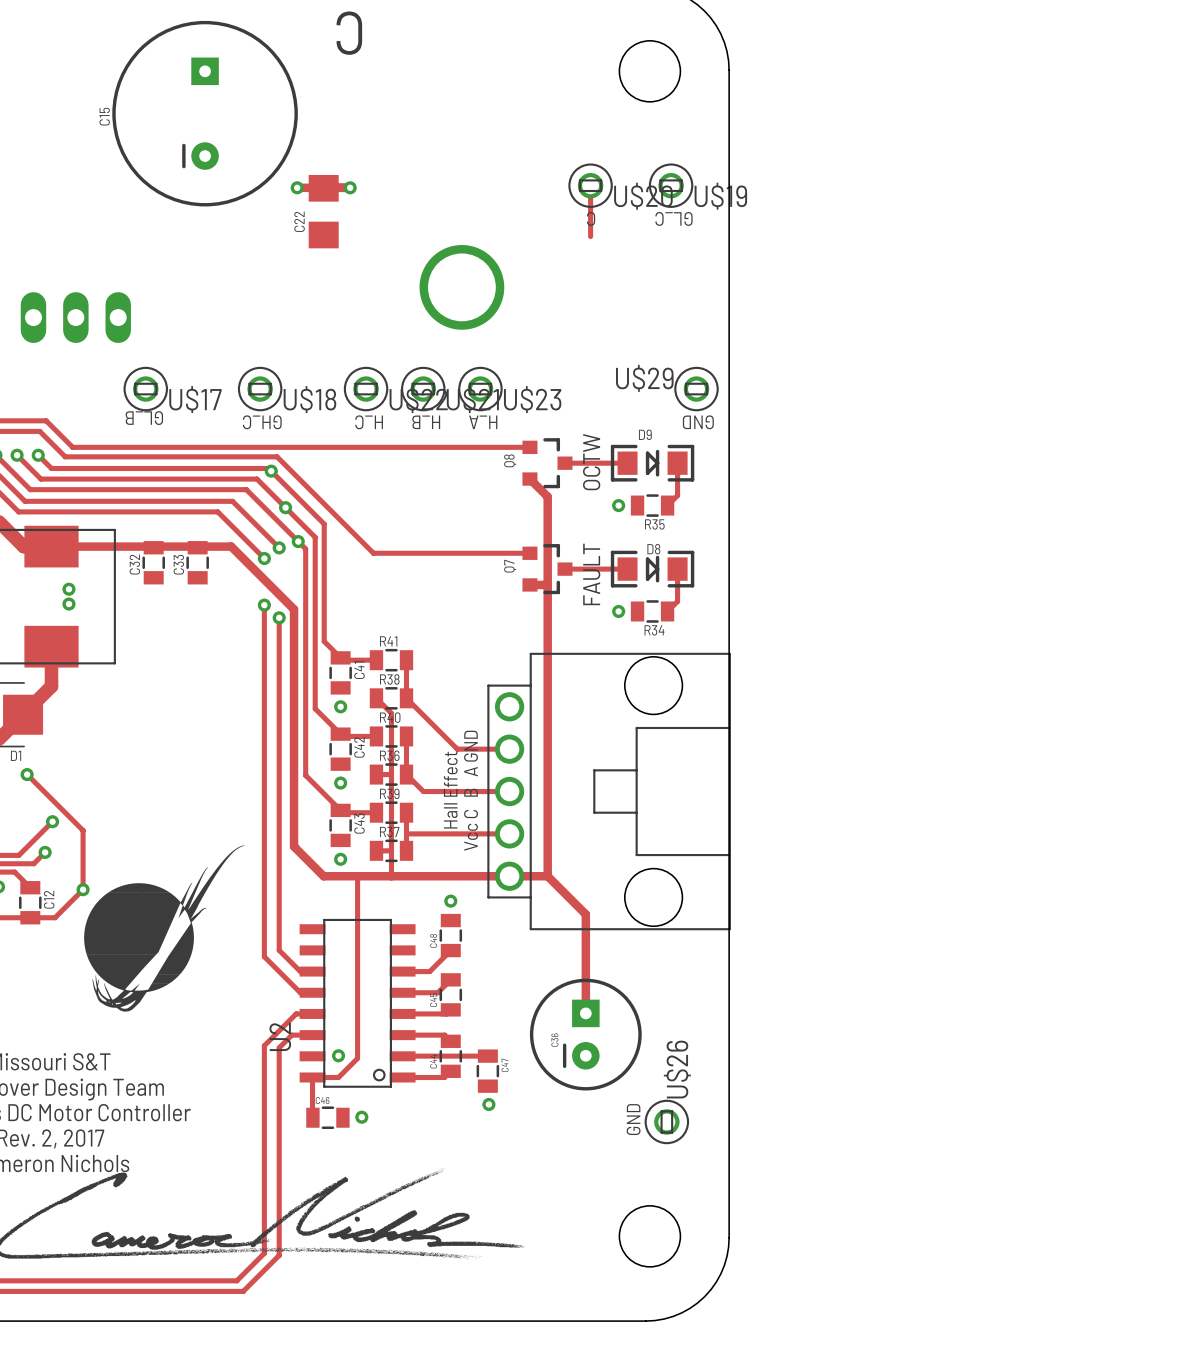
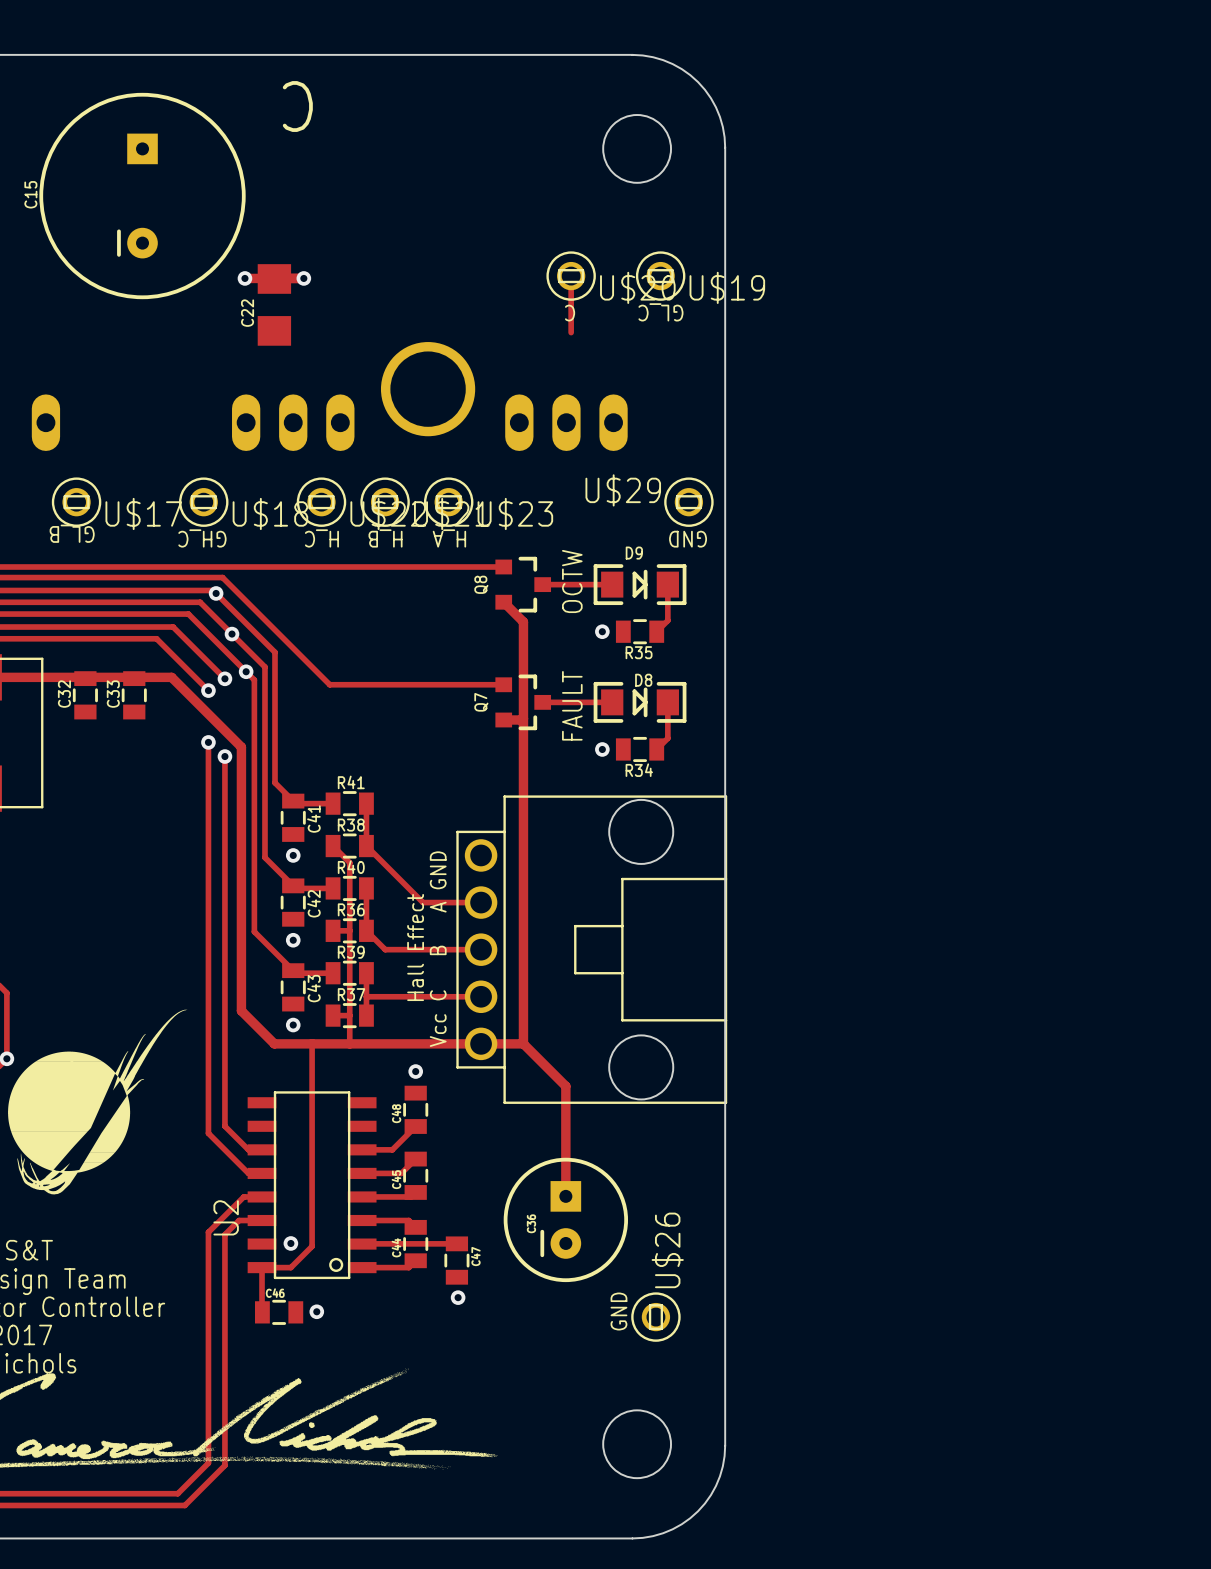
part: none -> (293, 422)
part: none -> (566, 422)

